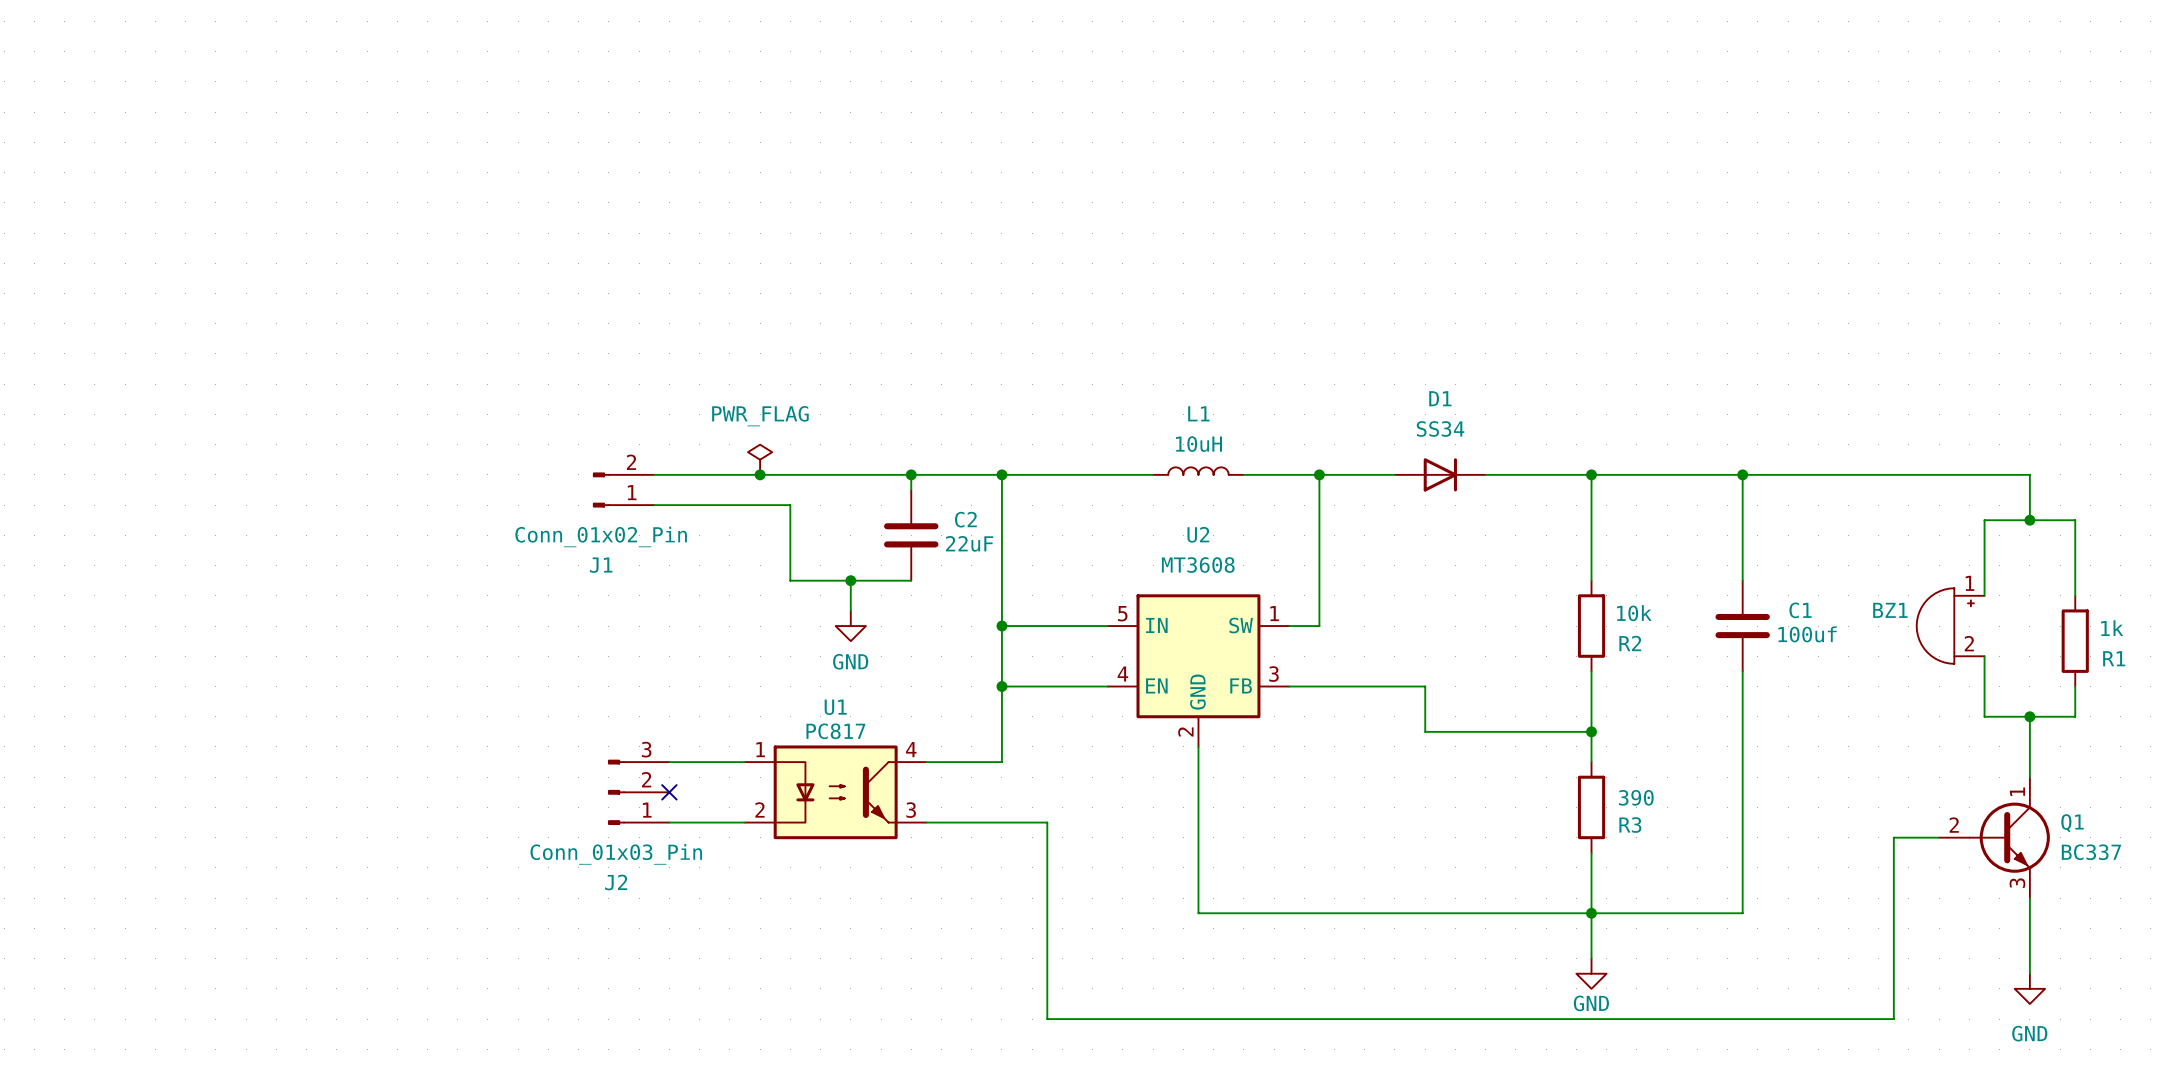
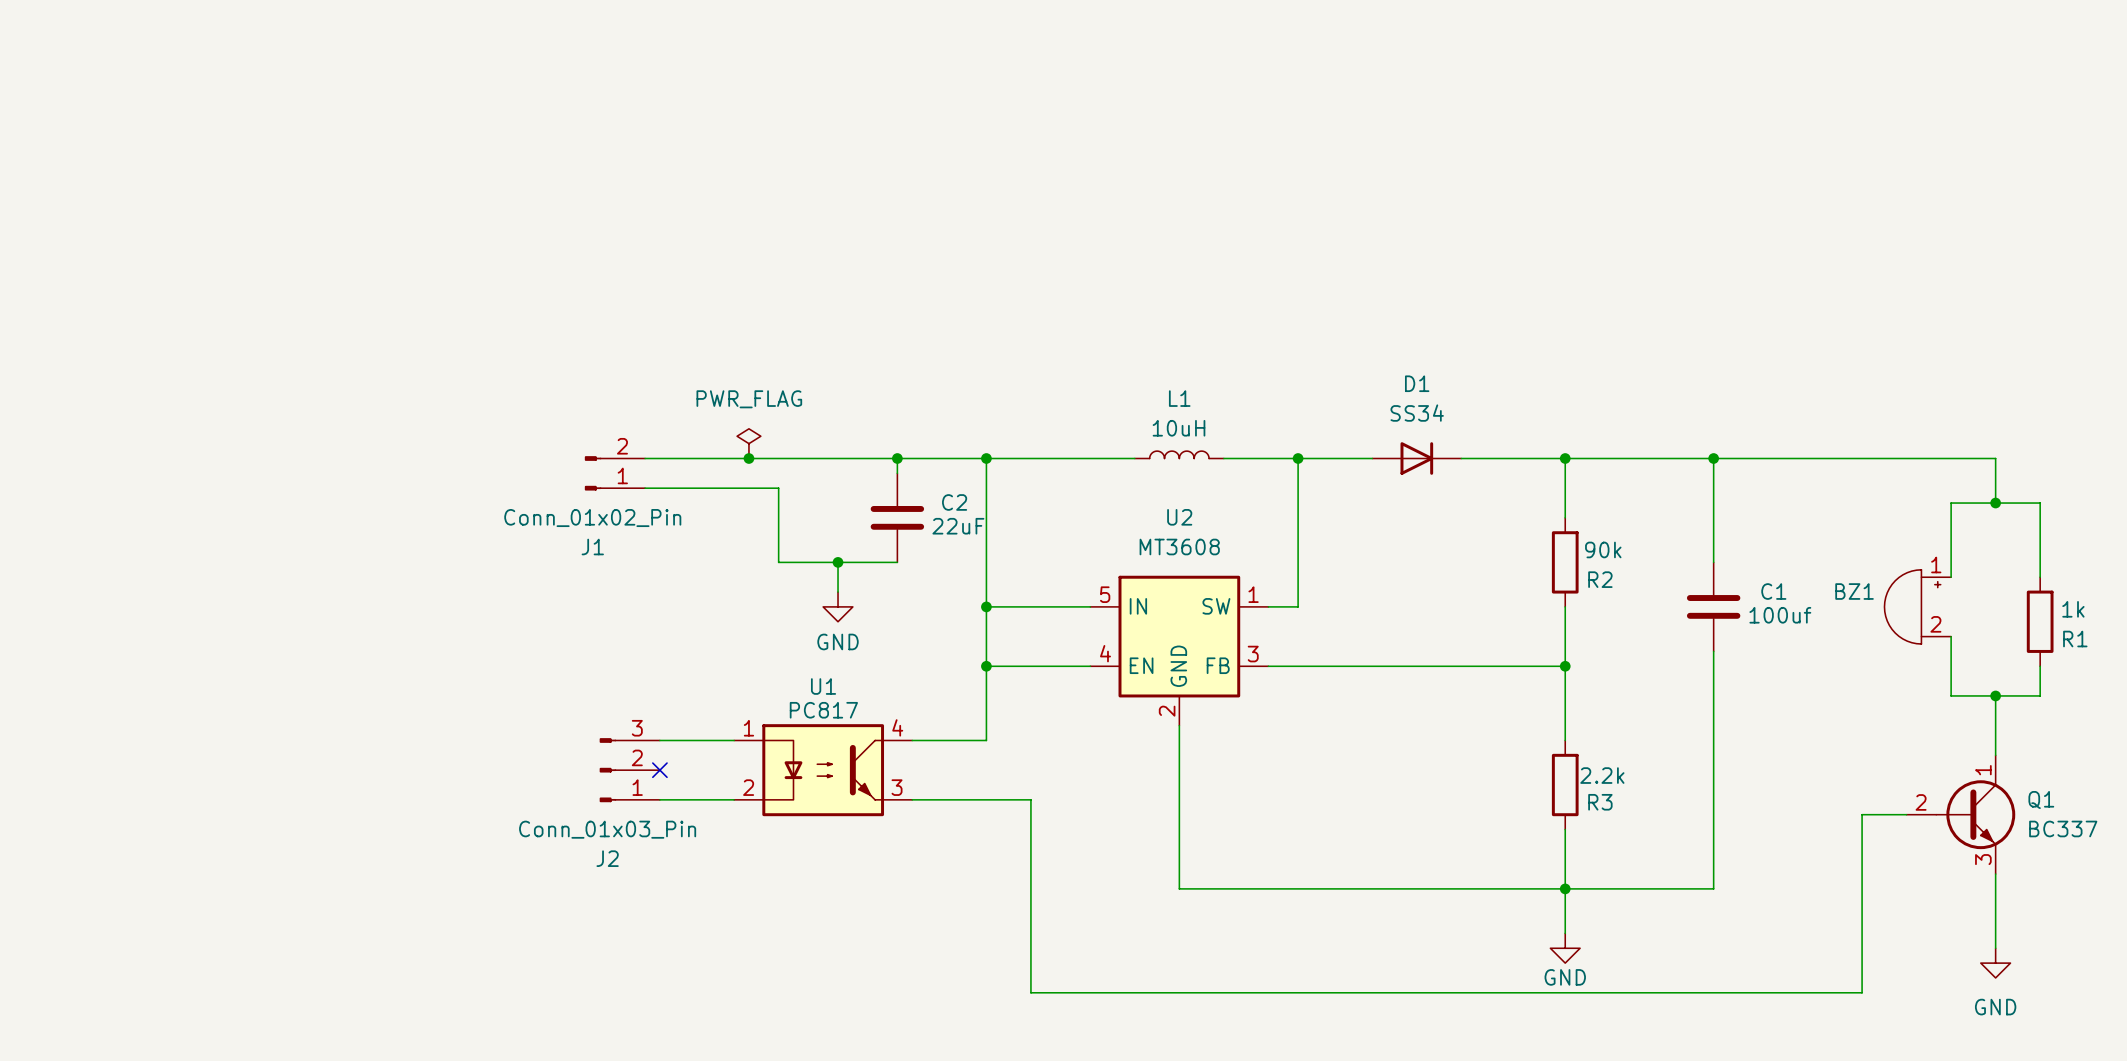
wire: (1591, 535) (1591, 580) -> (1565, 606) (1565, 651)
R2 value: 10k (1634, 613) -> 90k (1603, 549)
R2 position: (1591, 626) -> (1565, 562)
wire: (1425, 686) (1425, 731) (1591, 731) -> (1401, 666) (1565, 666)
junction position: (1591, 731) -> (1565, 666)
R3 value: 390 (1636, 797) -> 2.2k (1602, 775)

